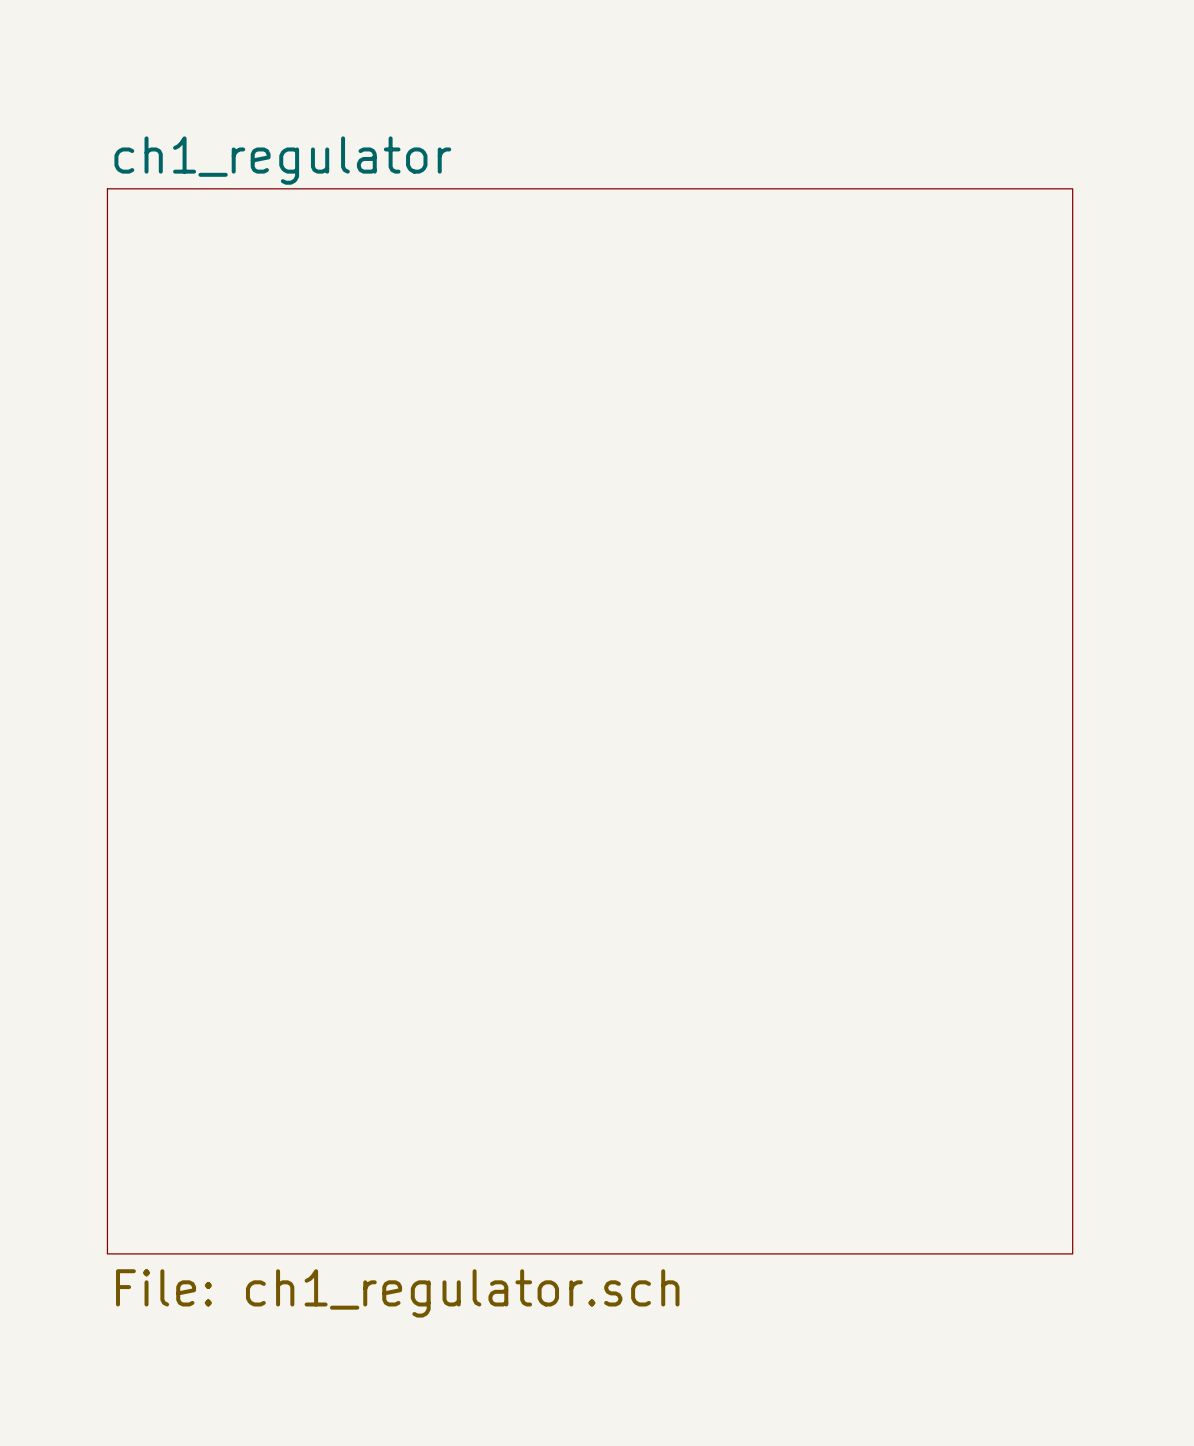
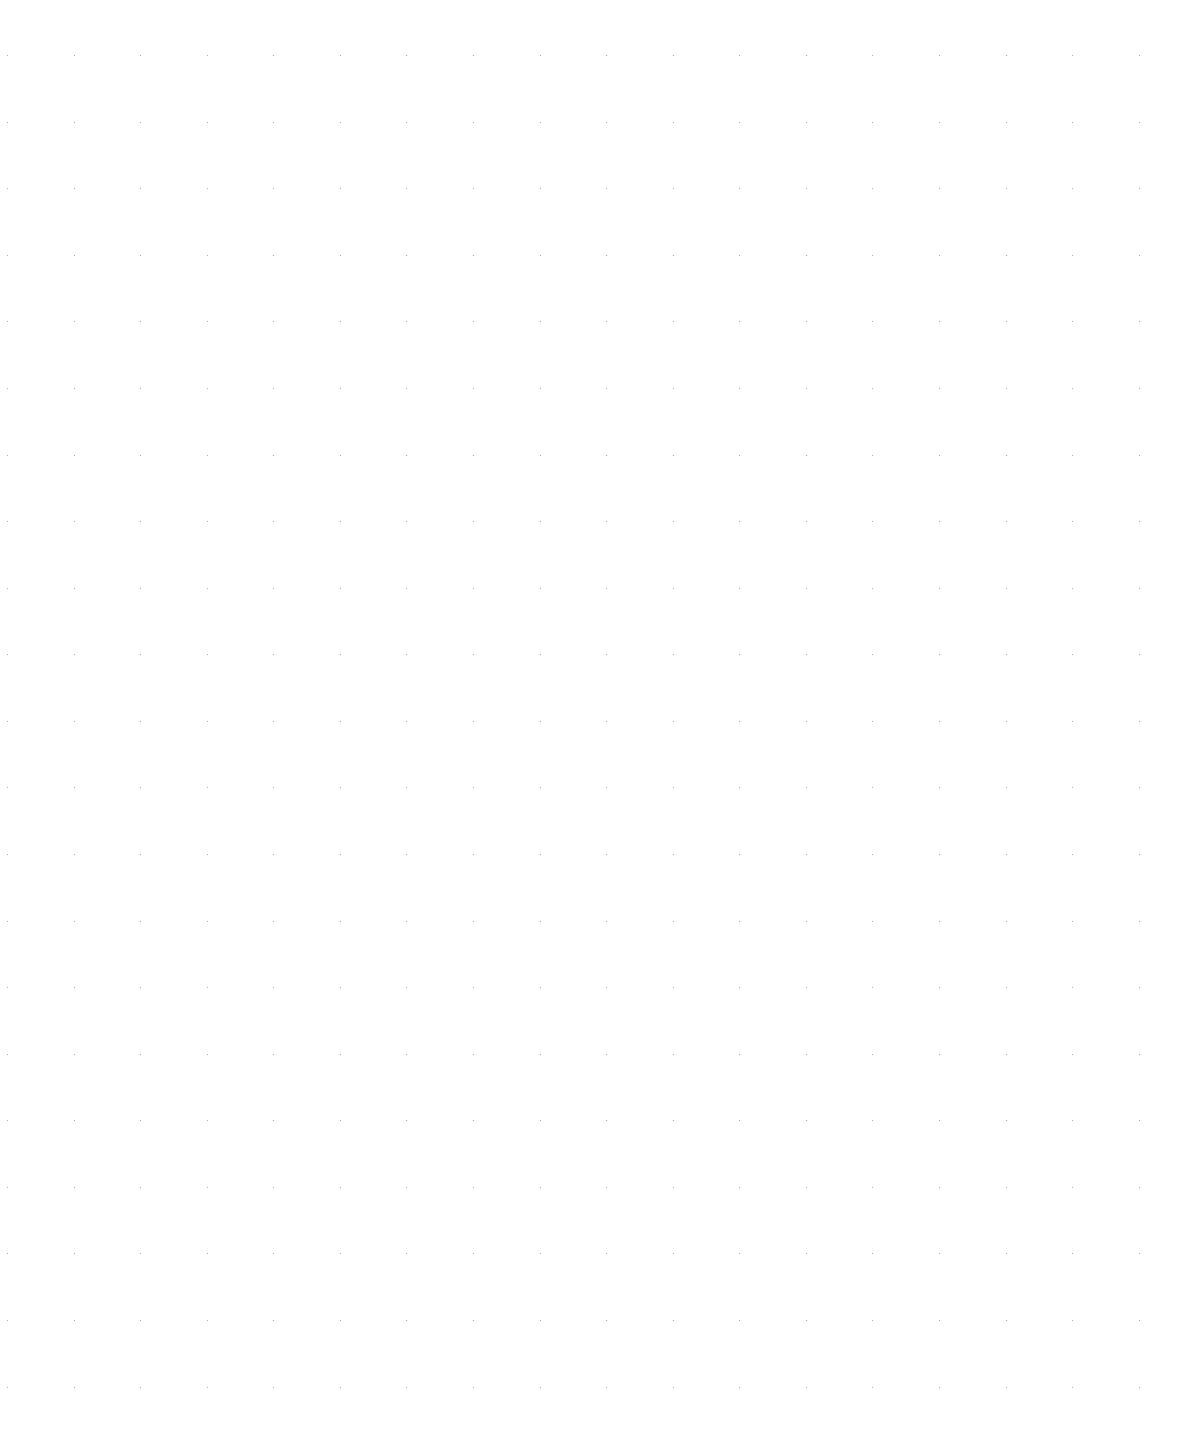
sheet ch1_regulator: File: ch1_regulator.sch (590, 721) -> none

